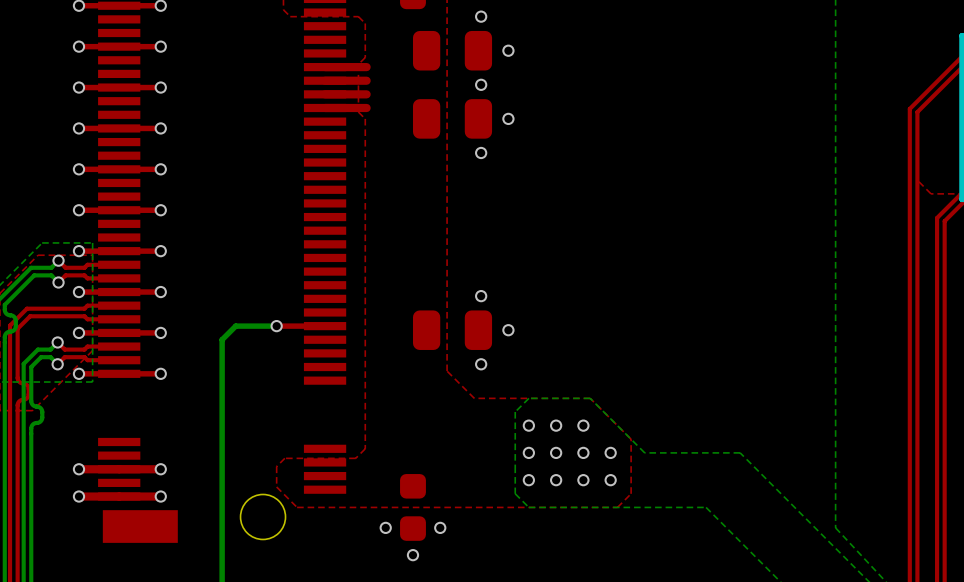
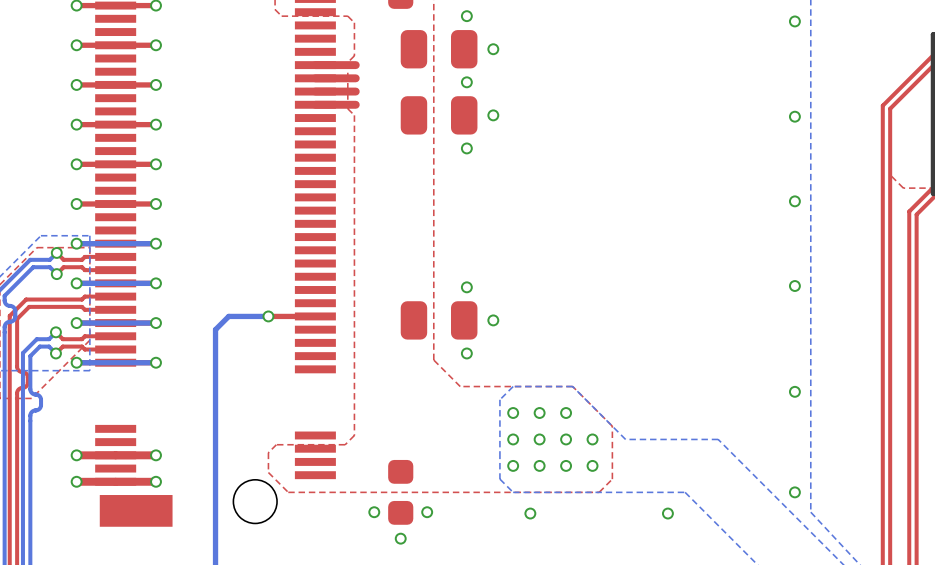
via: none -> (794, 21)
via: none -> (794, 116)
via: none -> (794, 201)
bottom track: none -> (156, 243) (76, 243)
bottom track: none -> (156, 283) (76, 283)
via: none -> (794, 286)
bottom track: none -> (156, 323) (76, 323)
bottom track: none -> (156, 362) (76, 362)
via: none -> (794, 391)
via: none -> (794, 492)
via: none -> (530, 513)
via: none -> (667, 513)

